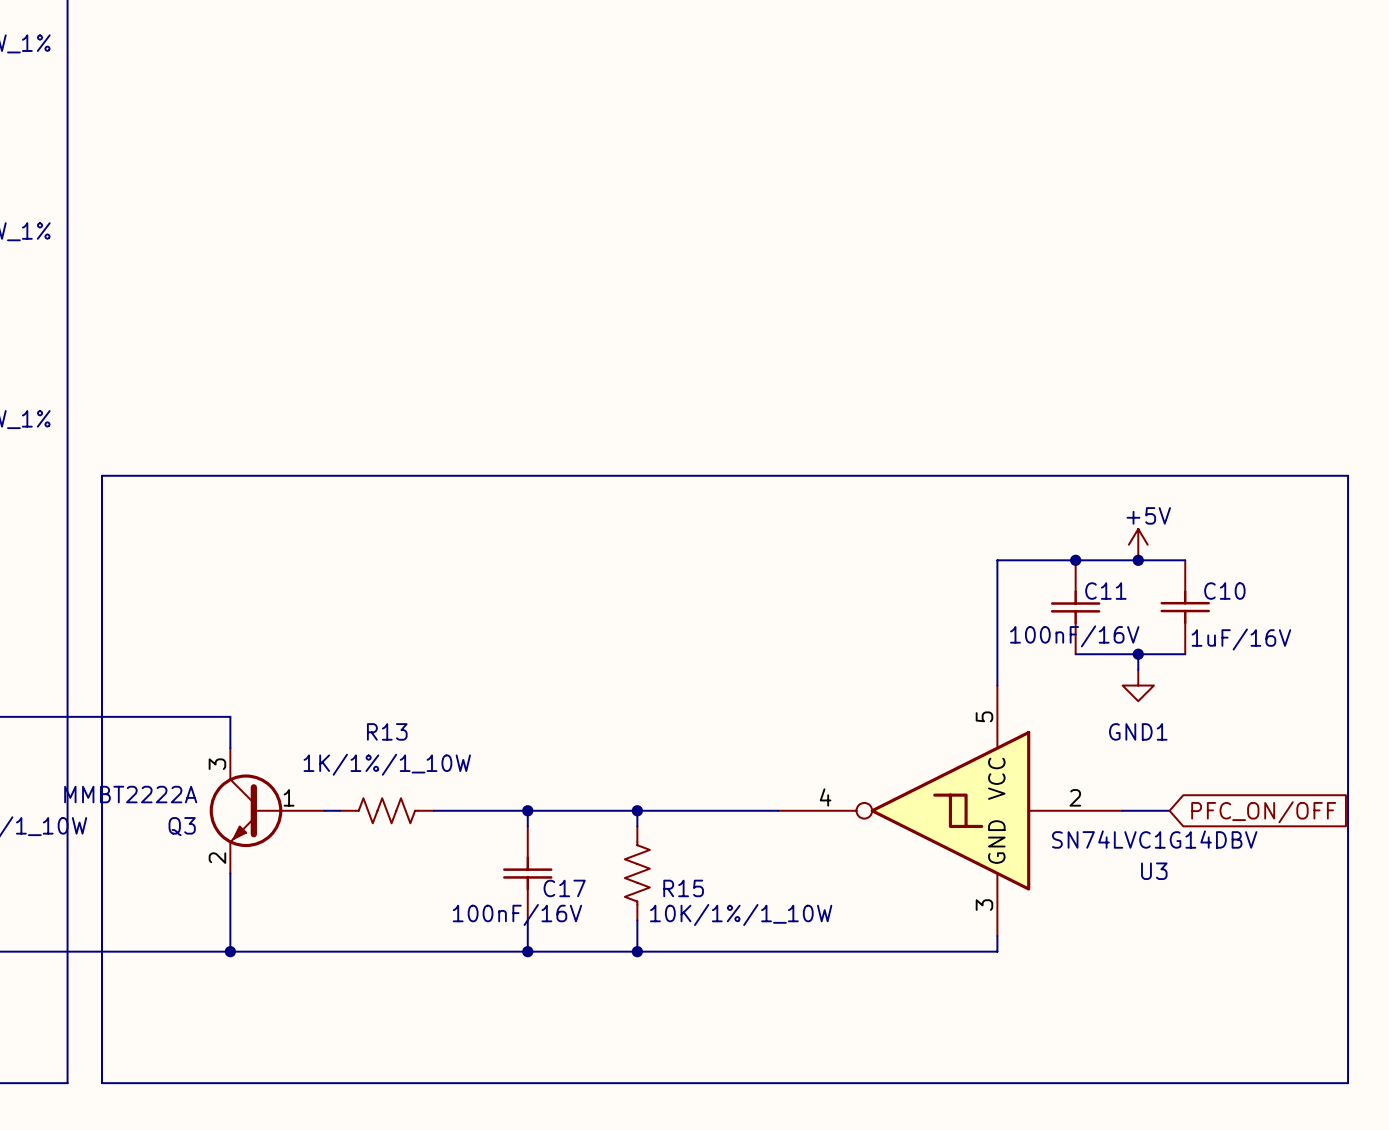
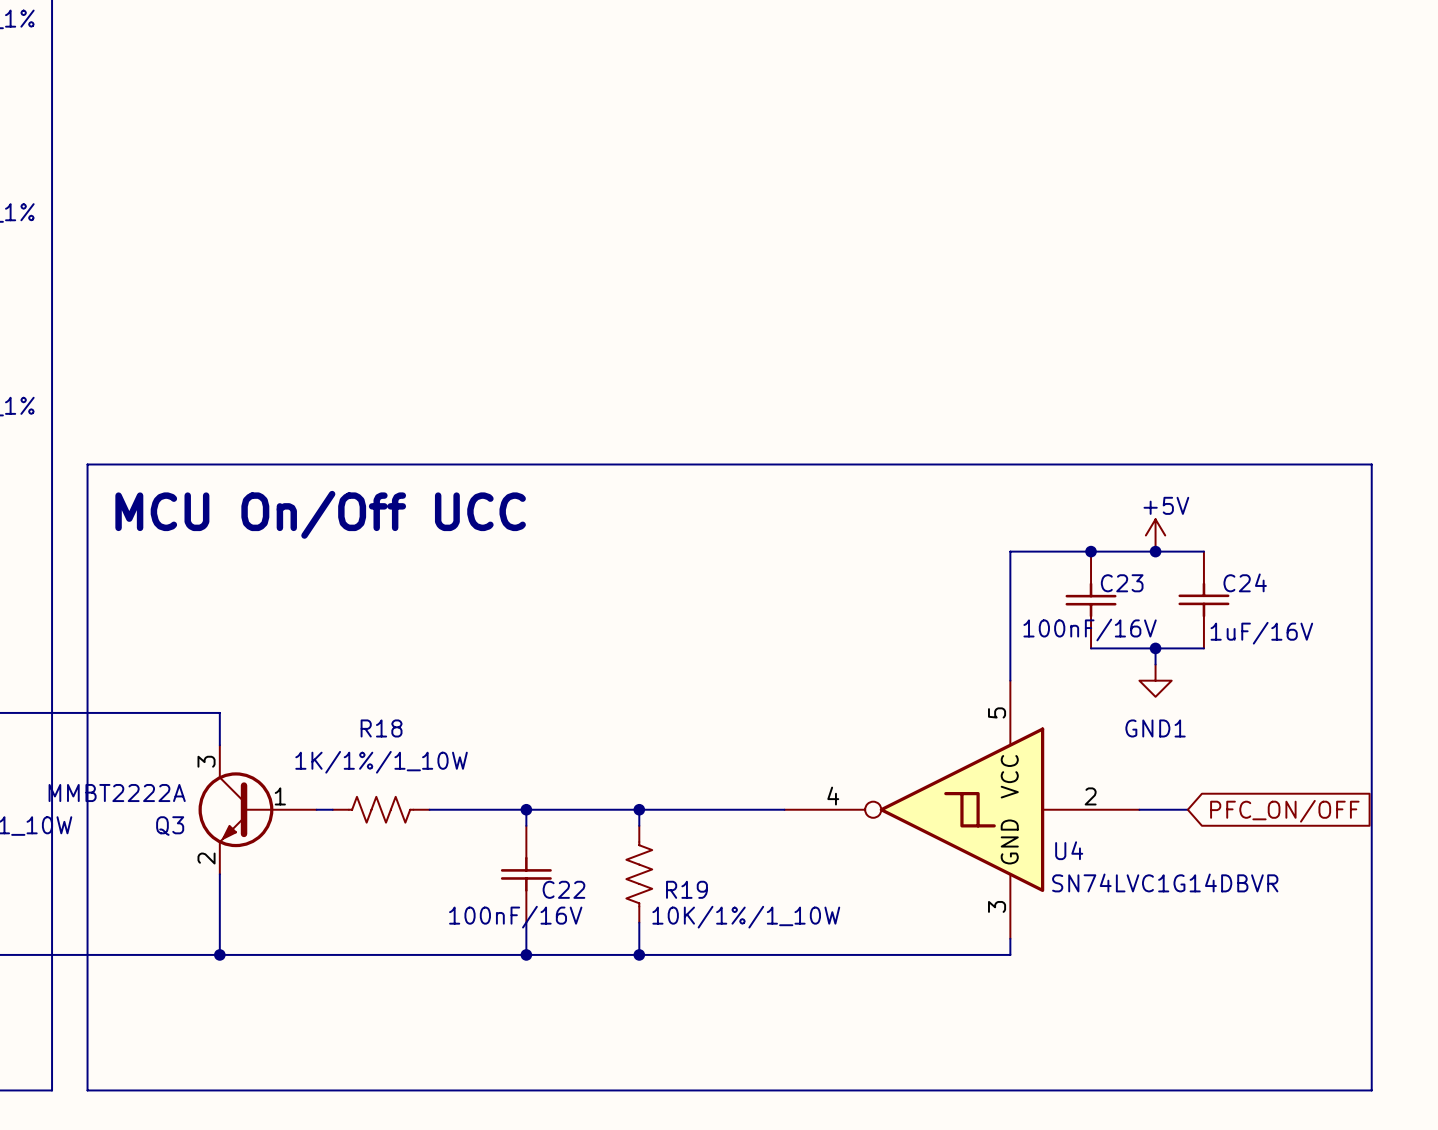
text: none -> MCU On/Off UCC (320, 514)
C11 name: C11 (1105, 591) -> C23 (1122, 583)
C10 name: C10 (1224, 591) -> C24 (1245, 582)
R13 name: R13 (387, 731) -> R18 (381, 728)
U3 value: SN74LVC1G14DBV (1154, 839) -> SN74LVC1G14DBVR (1165, 882)
U3 name: U3 (1154, 871) -> U4 (1069, 850)
C17 name: C17 (564, 888) -> C22 (563, 889)
R15 name: R15 (683, 888) -> R19 (686, 889)

